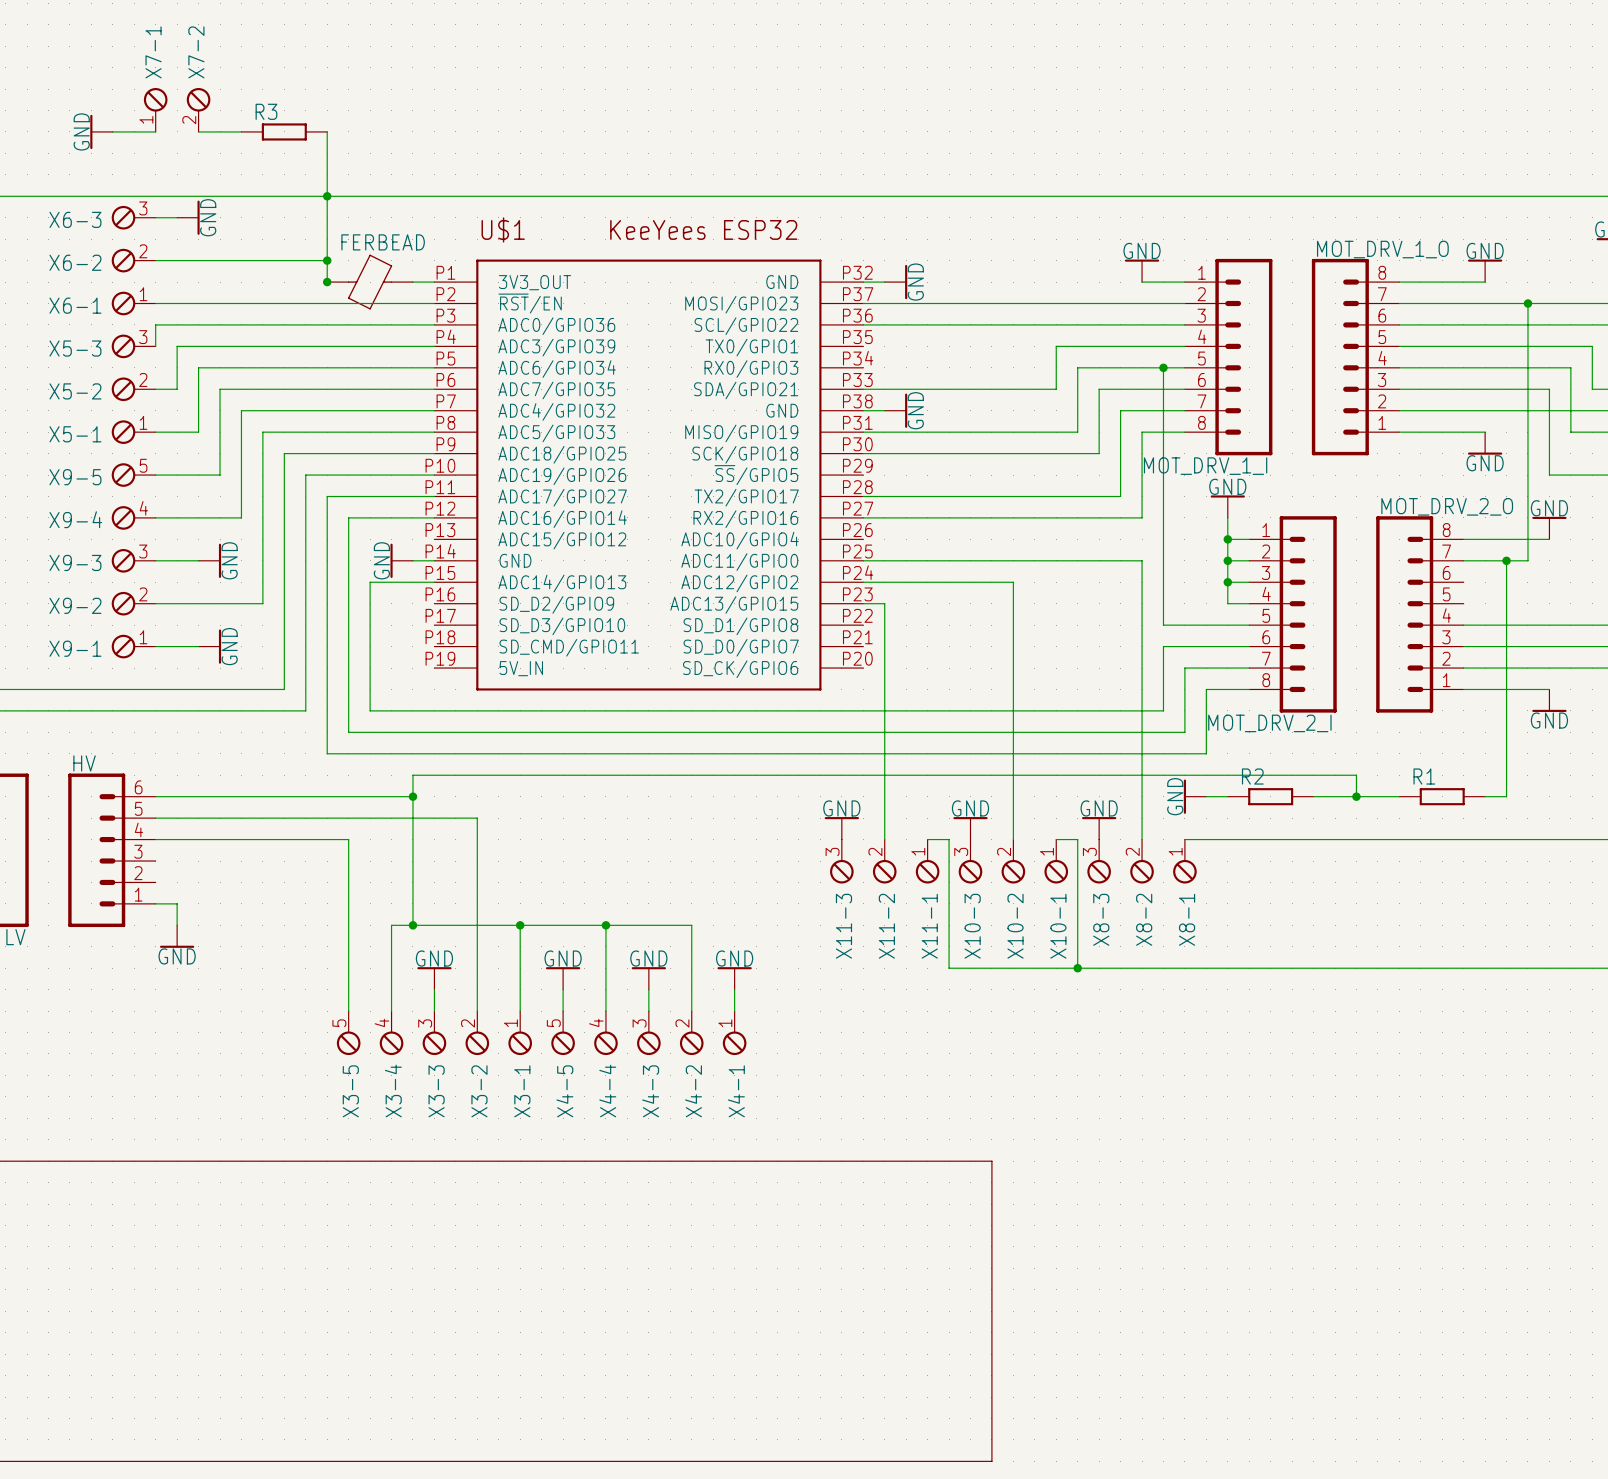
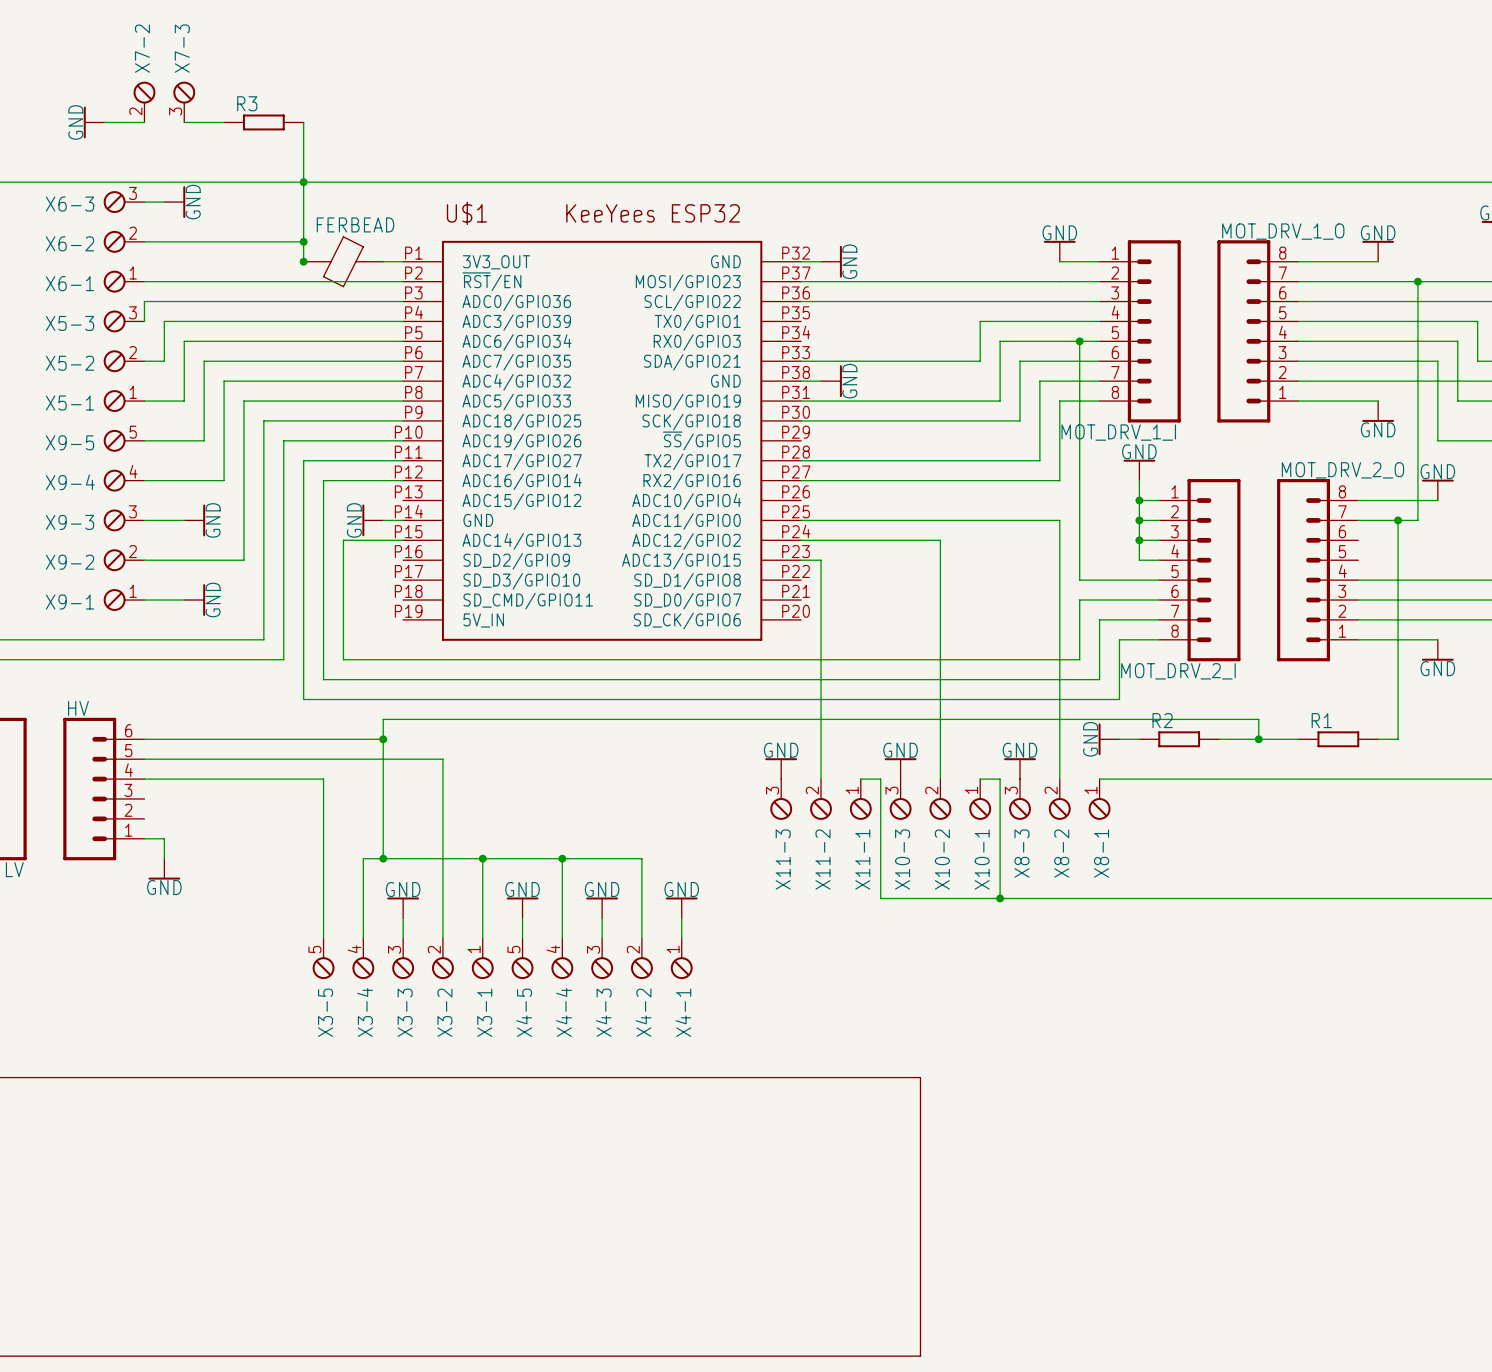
X7-1: (155, 109) -> none
X7-2 position: (198, 109) -> (144, 102)
X7-3: none -> (184, 102)

